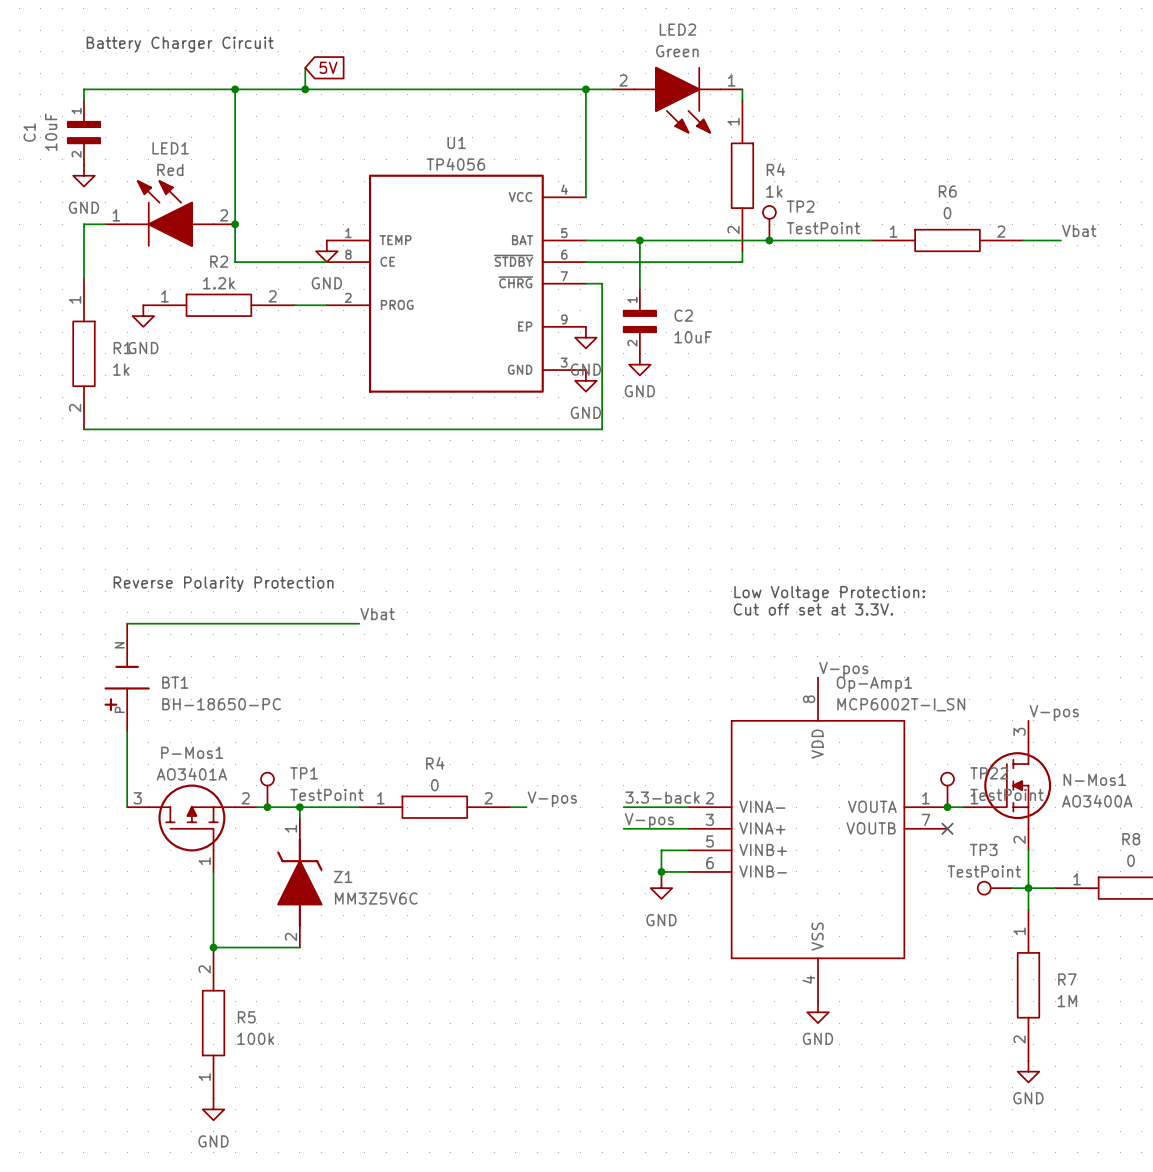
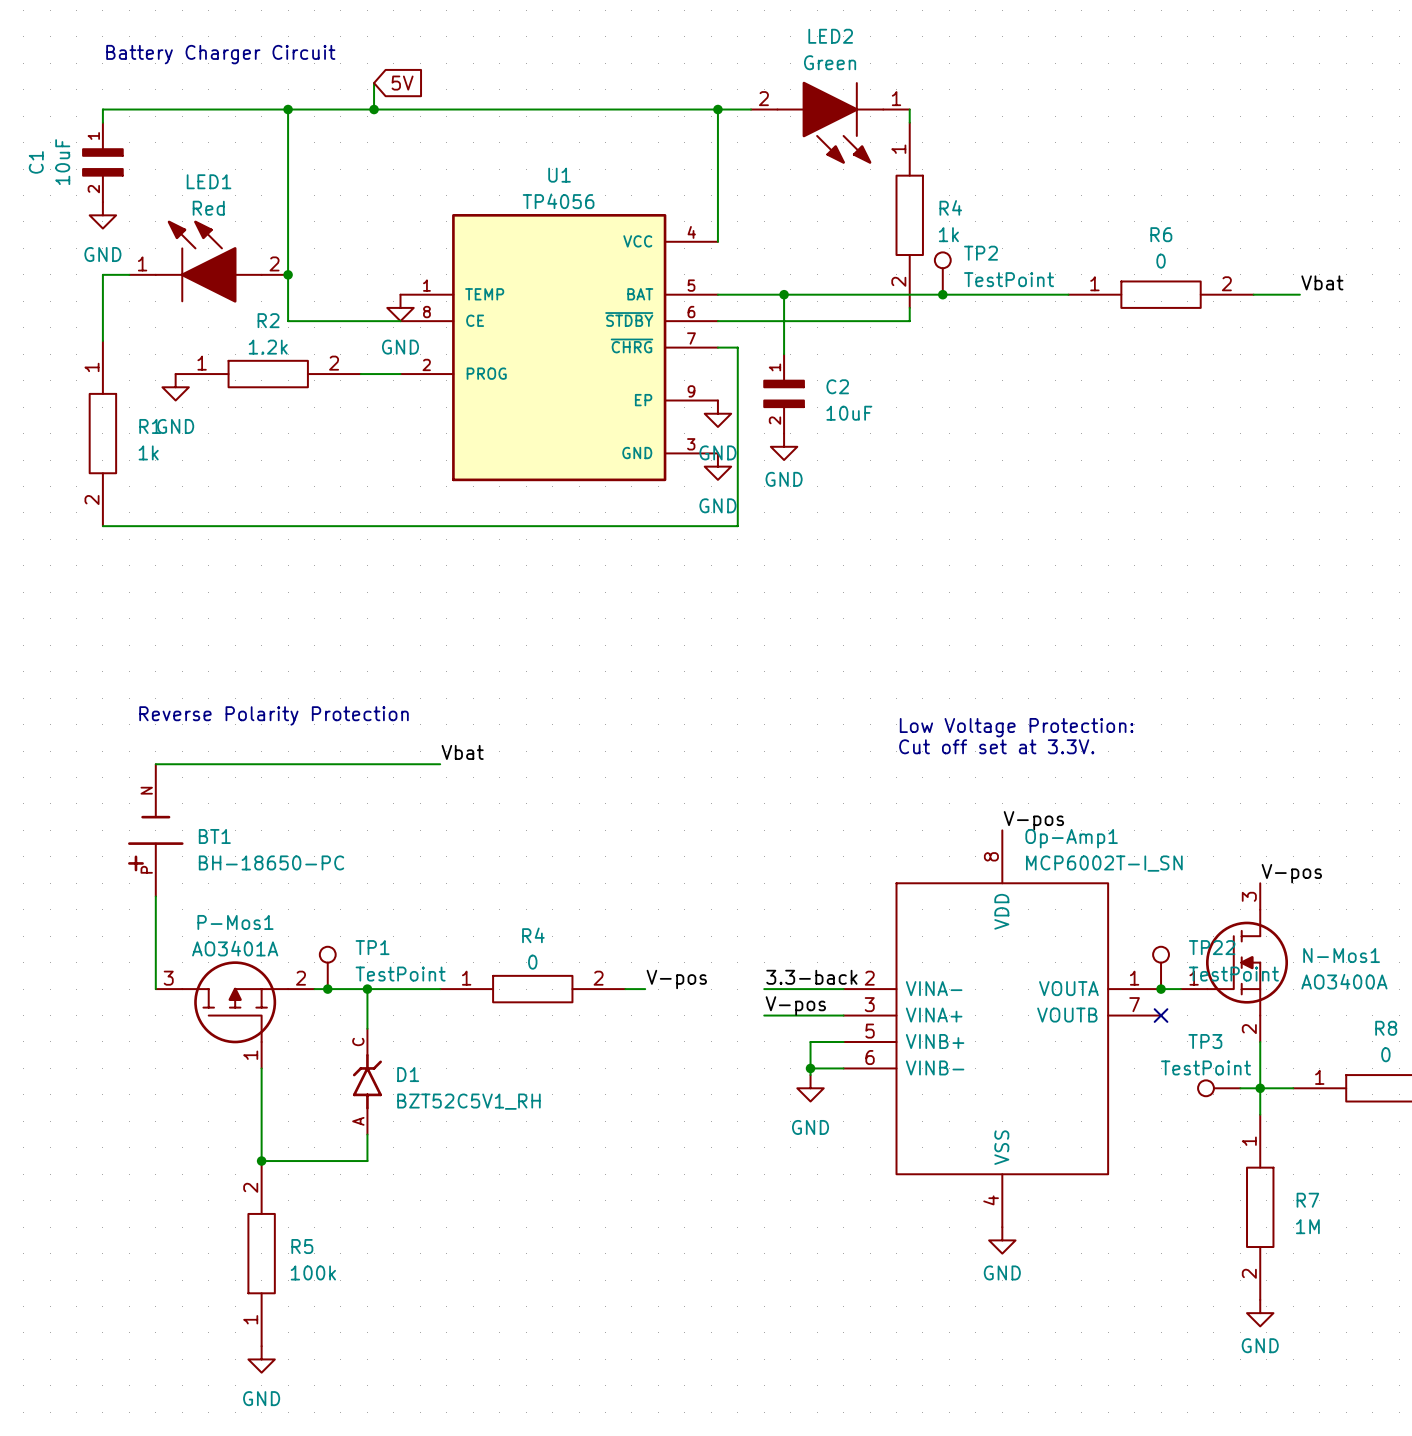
Z1: MM3Z5V6C (299, 882) -> none
D1: none -> BZT52C5V1_RH (367, 1081)

